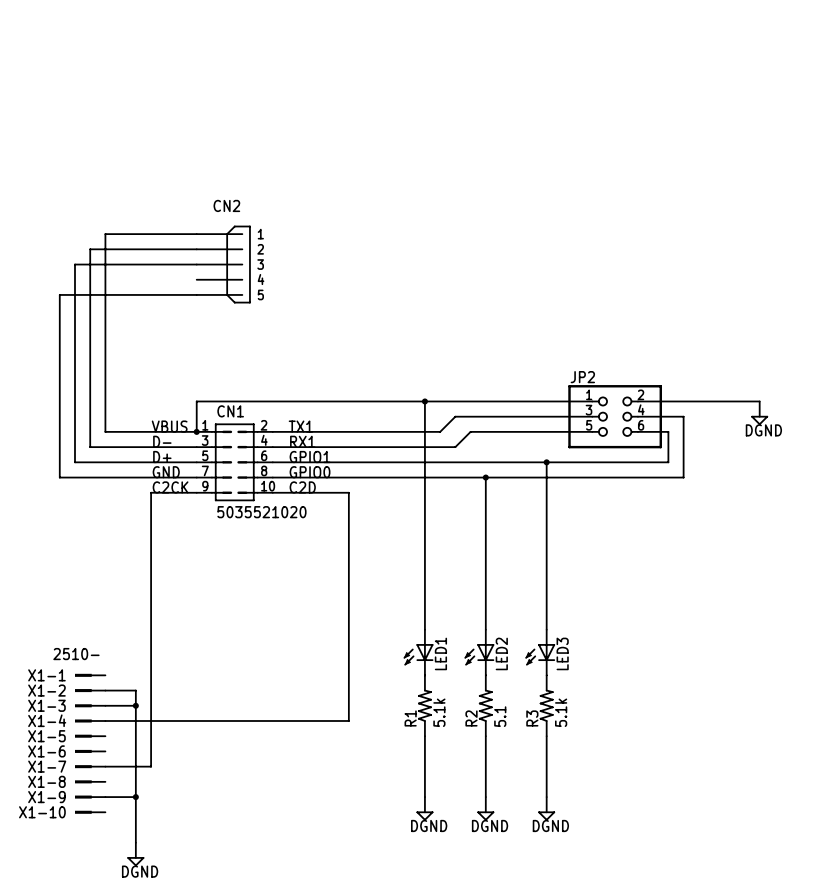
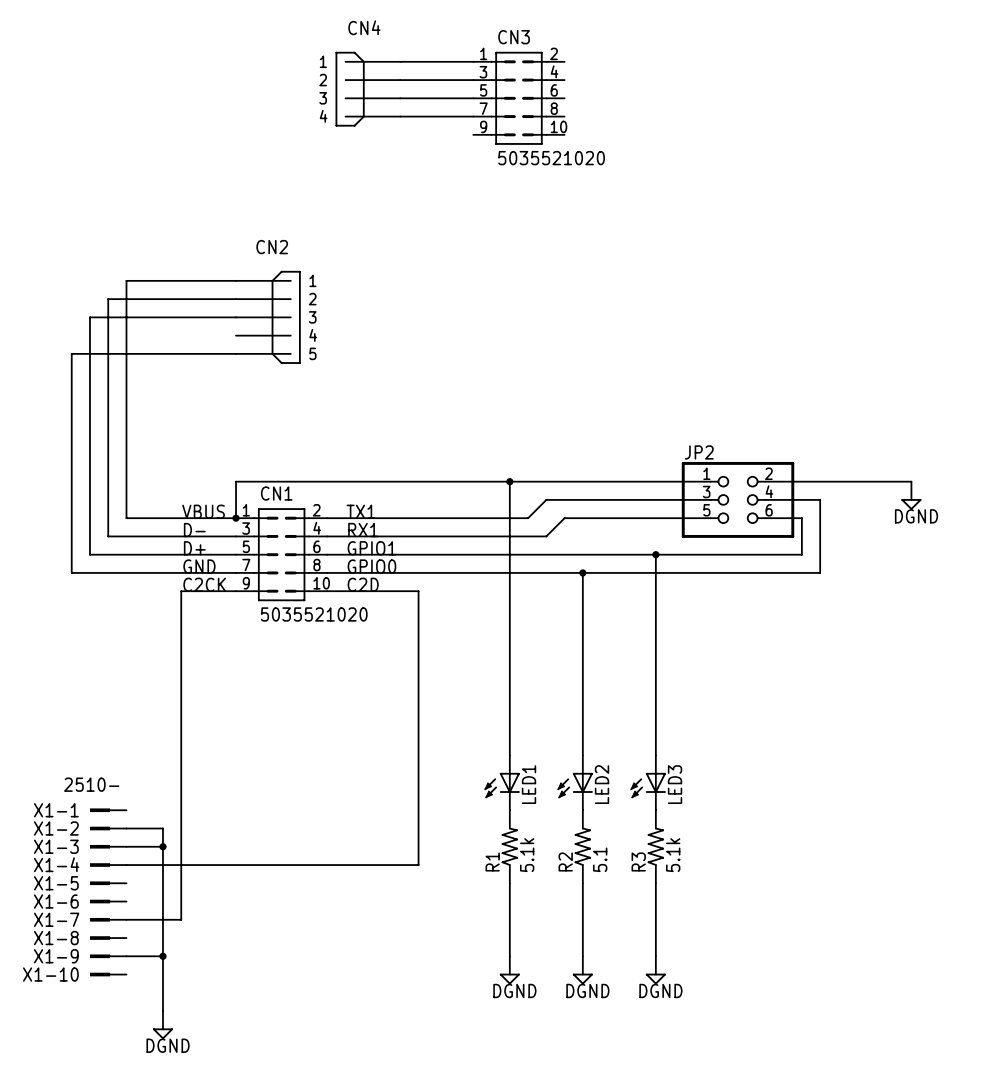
wire: none -> (400, 61) (473, 61)
wire: none -> (400, 80) (473, 80)
CN4: none -> (367, 89)
wire: none -> (400, 98) (473, 98)
CN3: none -> 5035521020 (518, 98)
wire: none -> (400, 116) (473, 116)

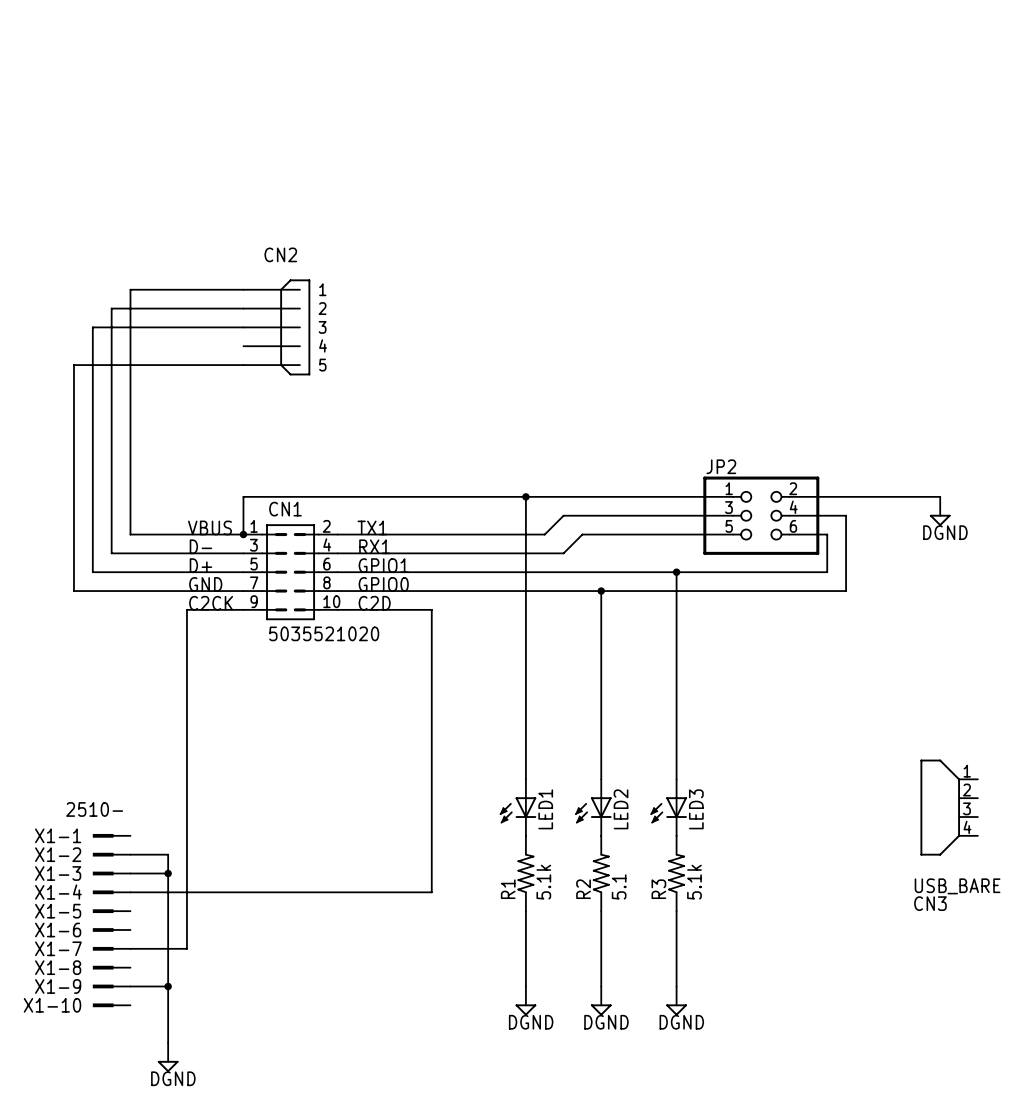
CN3 name position: CN3 (514, 37) -> CN3 (930, 903)
CN3 symbol: [473, 51, 565, 145] -> [920, 759, 978, 856]
wire: (400, 61) (473, 61) -> none
wire: (400, 80) (473, 80) -> none
CN4: (367, 89) -> none
wire: (400, 98) (473, 98) -> none
wire: (400, 116) (473, 116) -> none
CN3 value: 5035521020 (551, 158) -> USB_BARE (957, 886)

